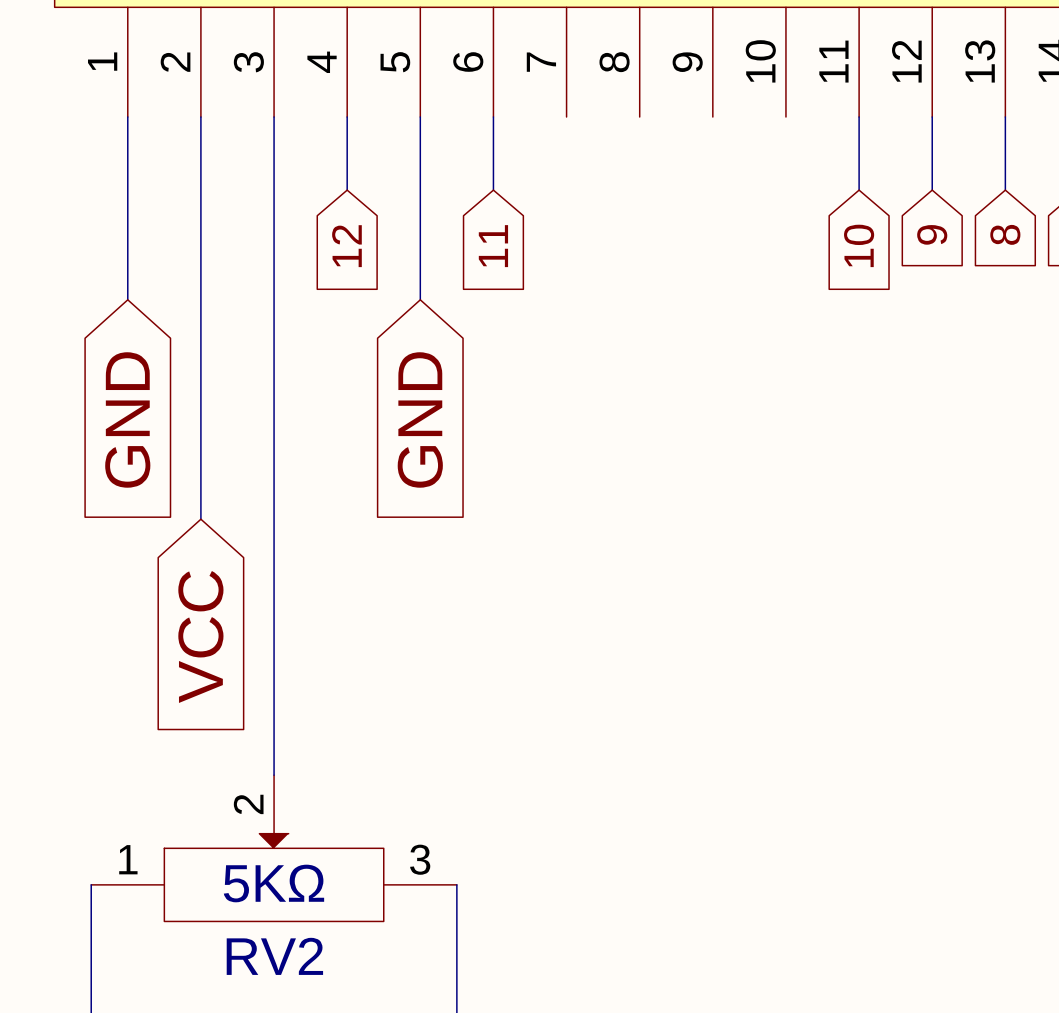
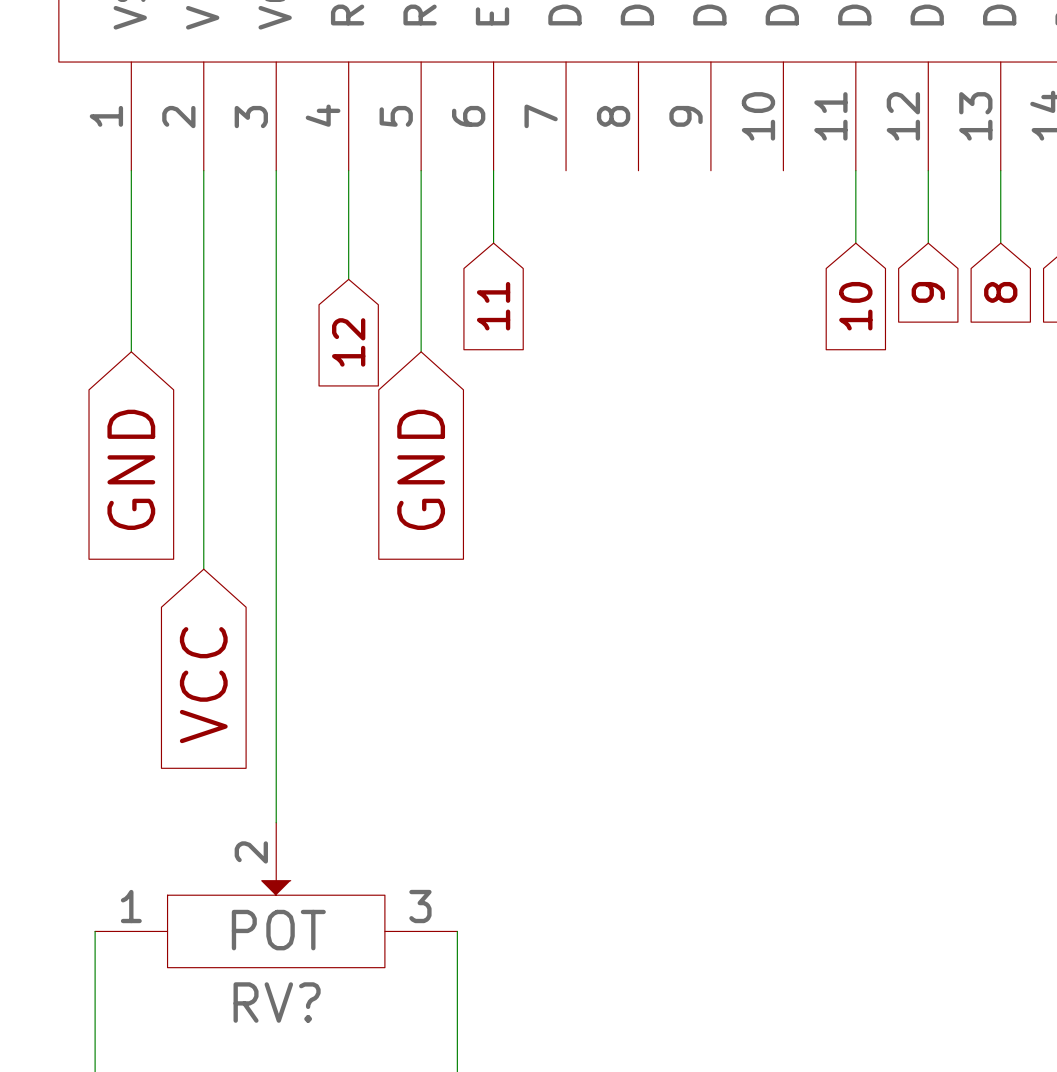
wire: none -> (348, 243) (348, 279)
global label position: 12 (346, 246) -> 12 (348, 342)
RV2 value: 5KΩ (273, 883) -> POT (278, 930)
RV2 name: RV2 (274, 956) -> RV? (277, 1002)

